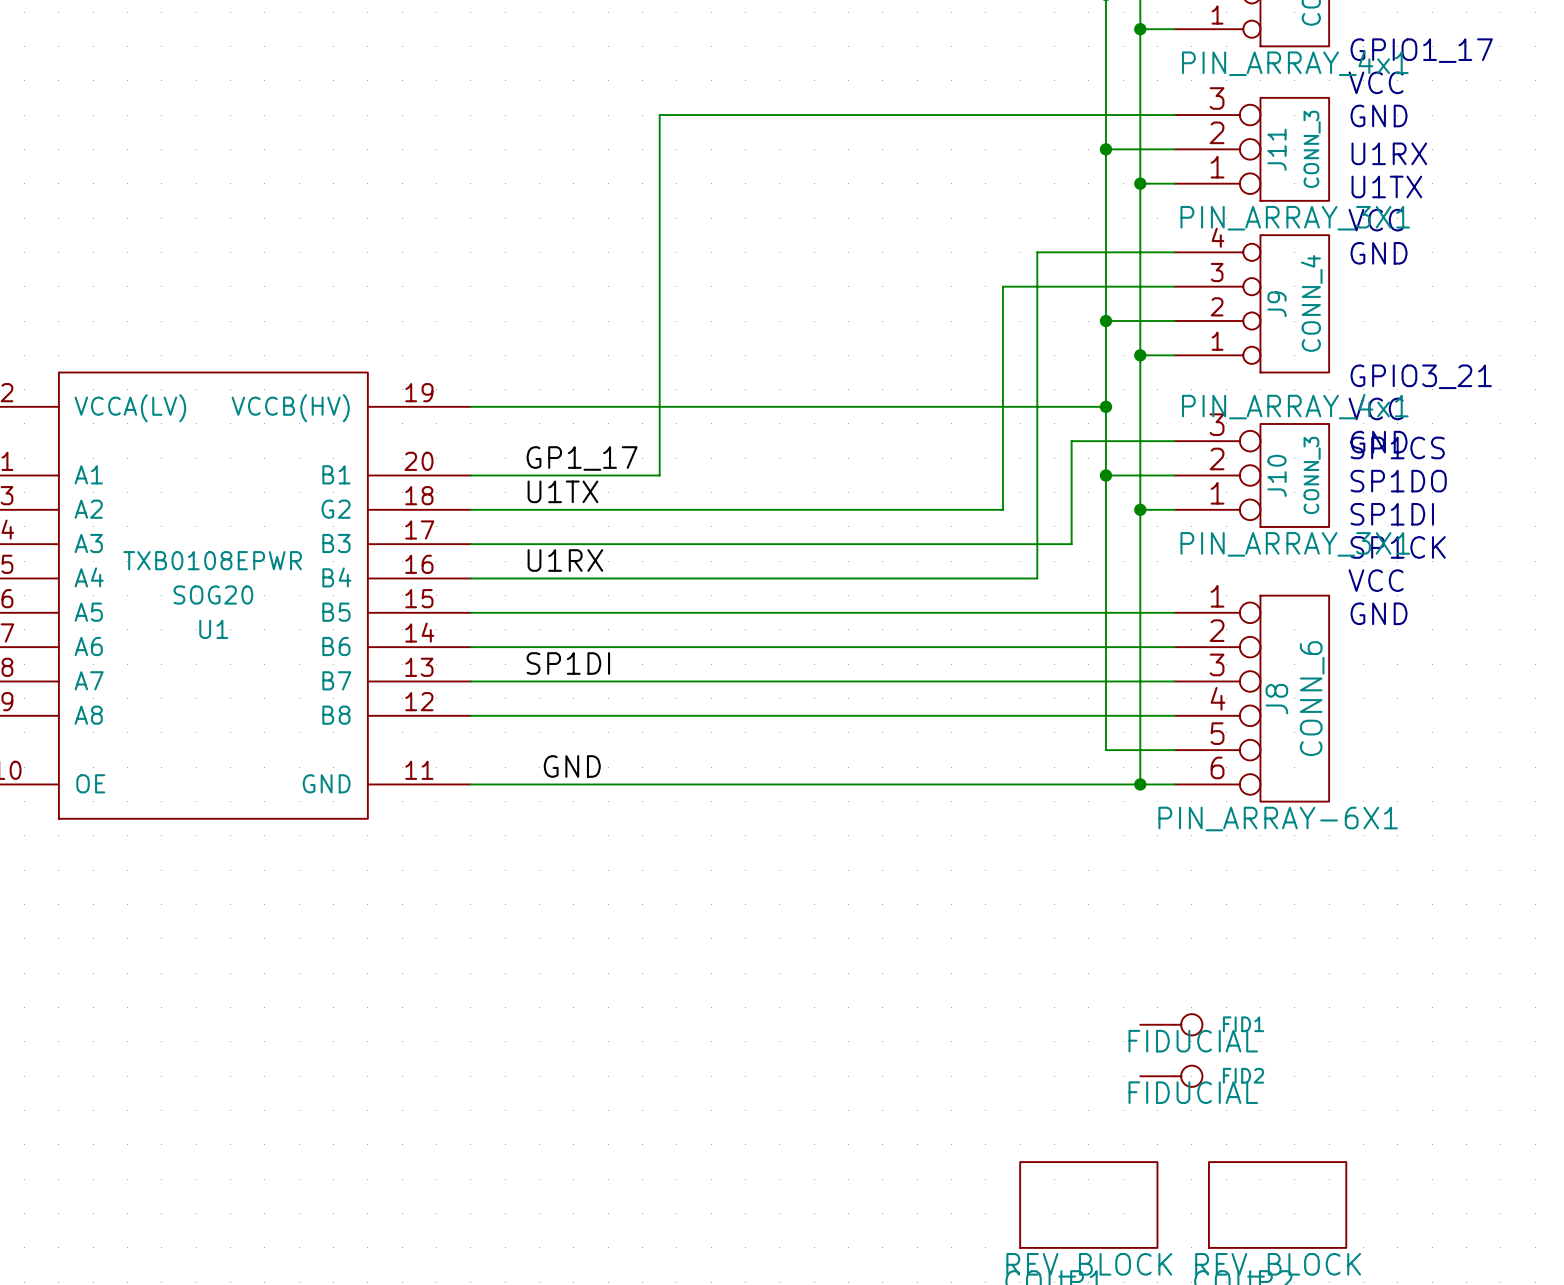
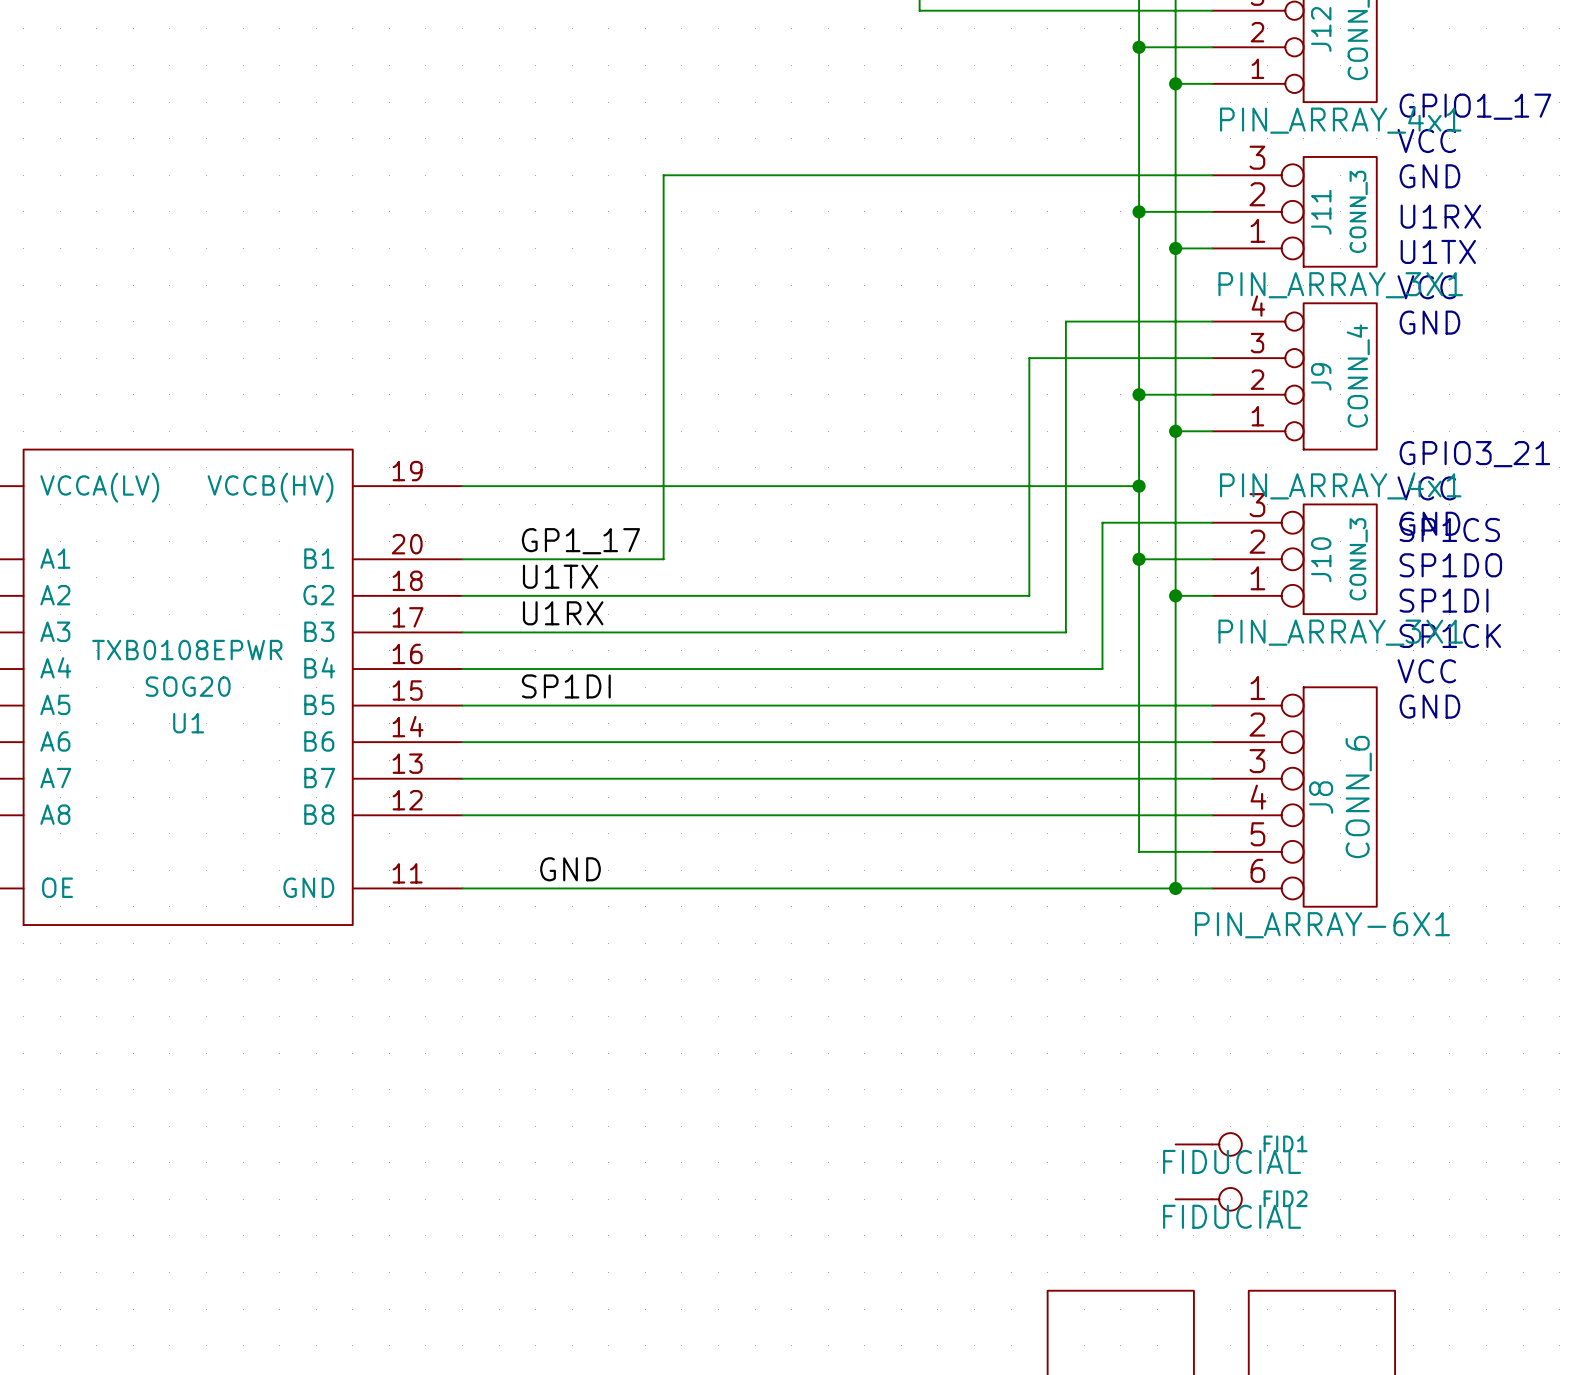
wire: (1071, 544) (1037, 544) (1037, 578) -> (1102, 632) (1102, 669) (1065, 669)
label position: U1RX (565, 560) -> U1RX (563, 613)
label position: SP1DI (568, 663) -> SP1DI (566, 686)

